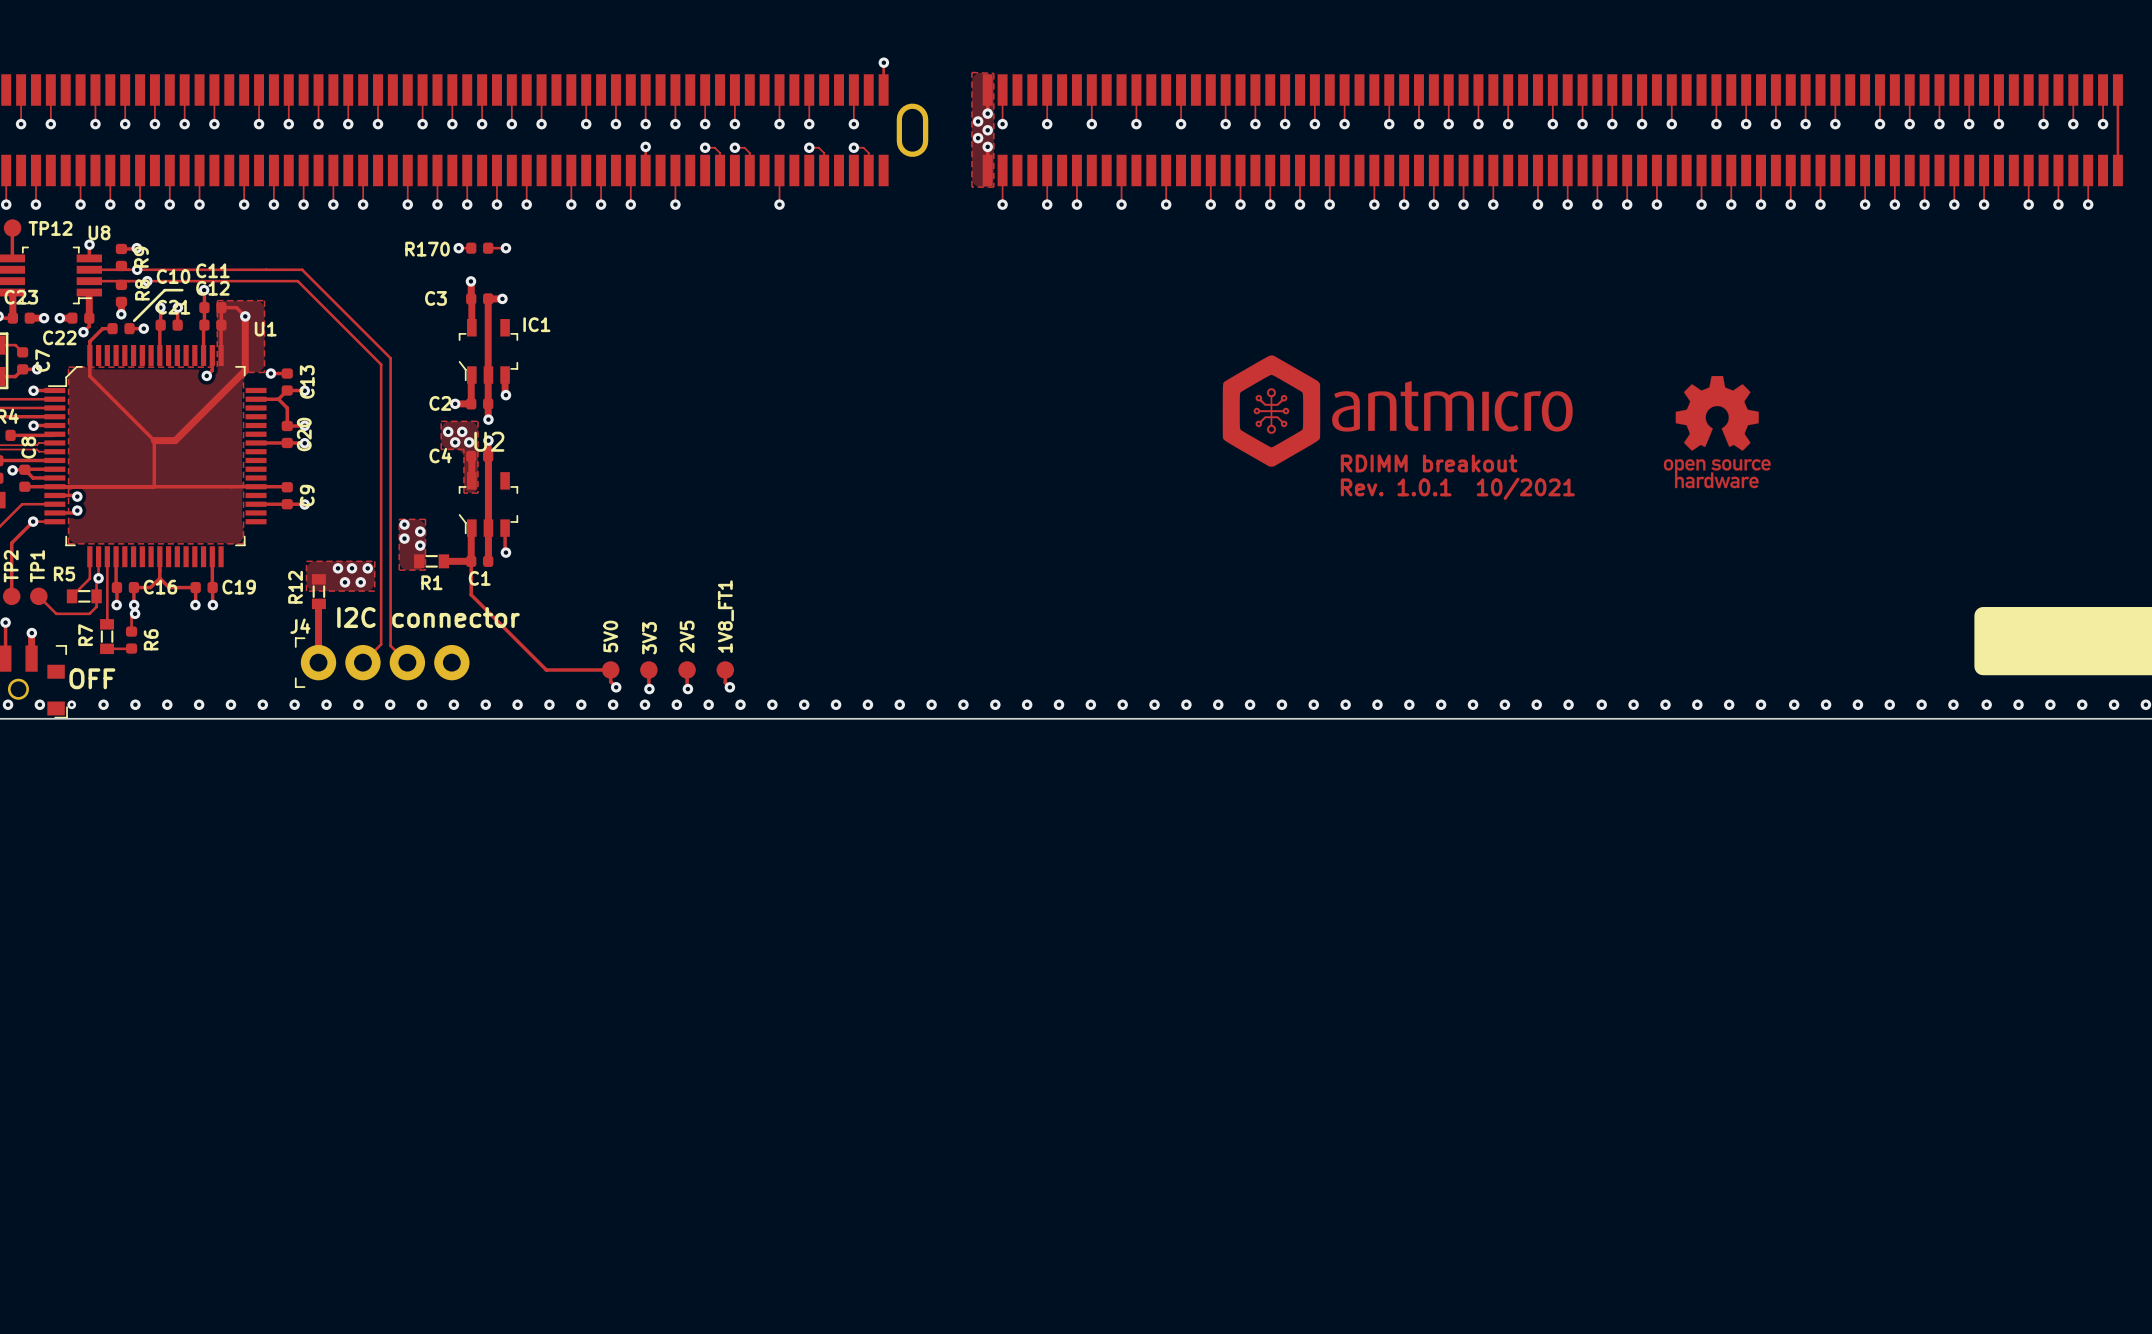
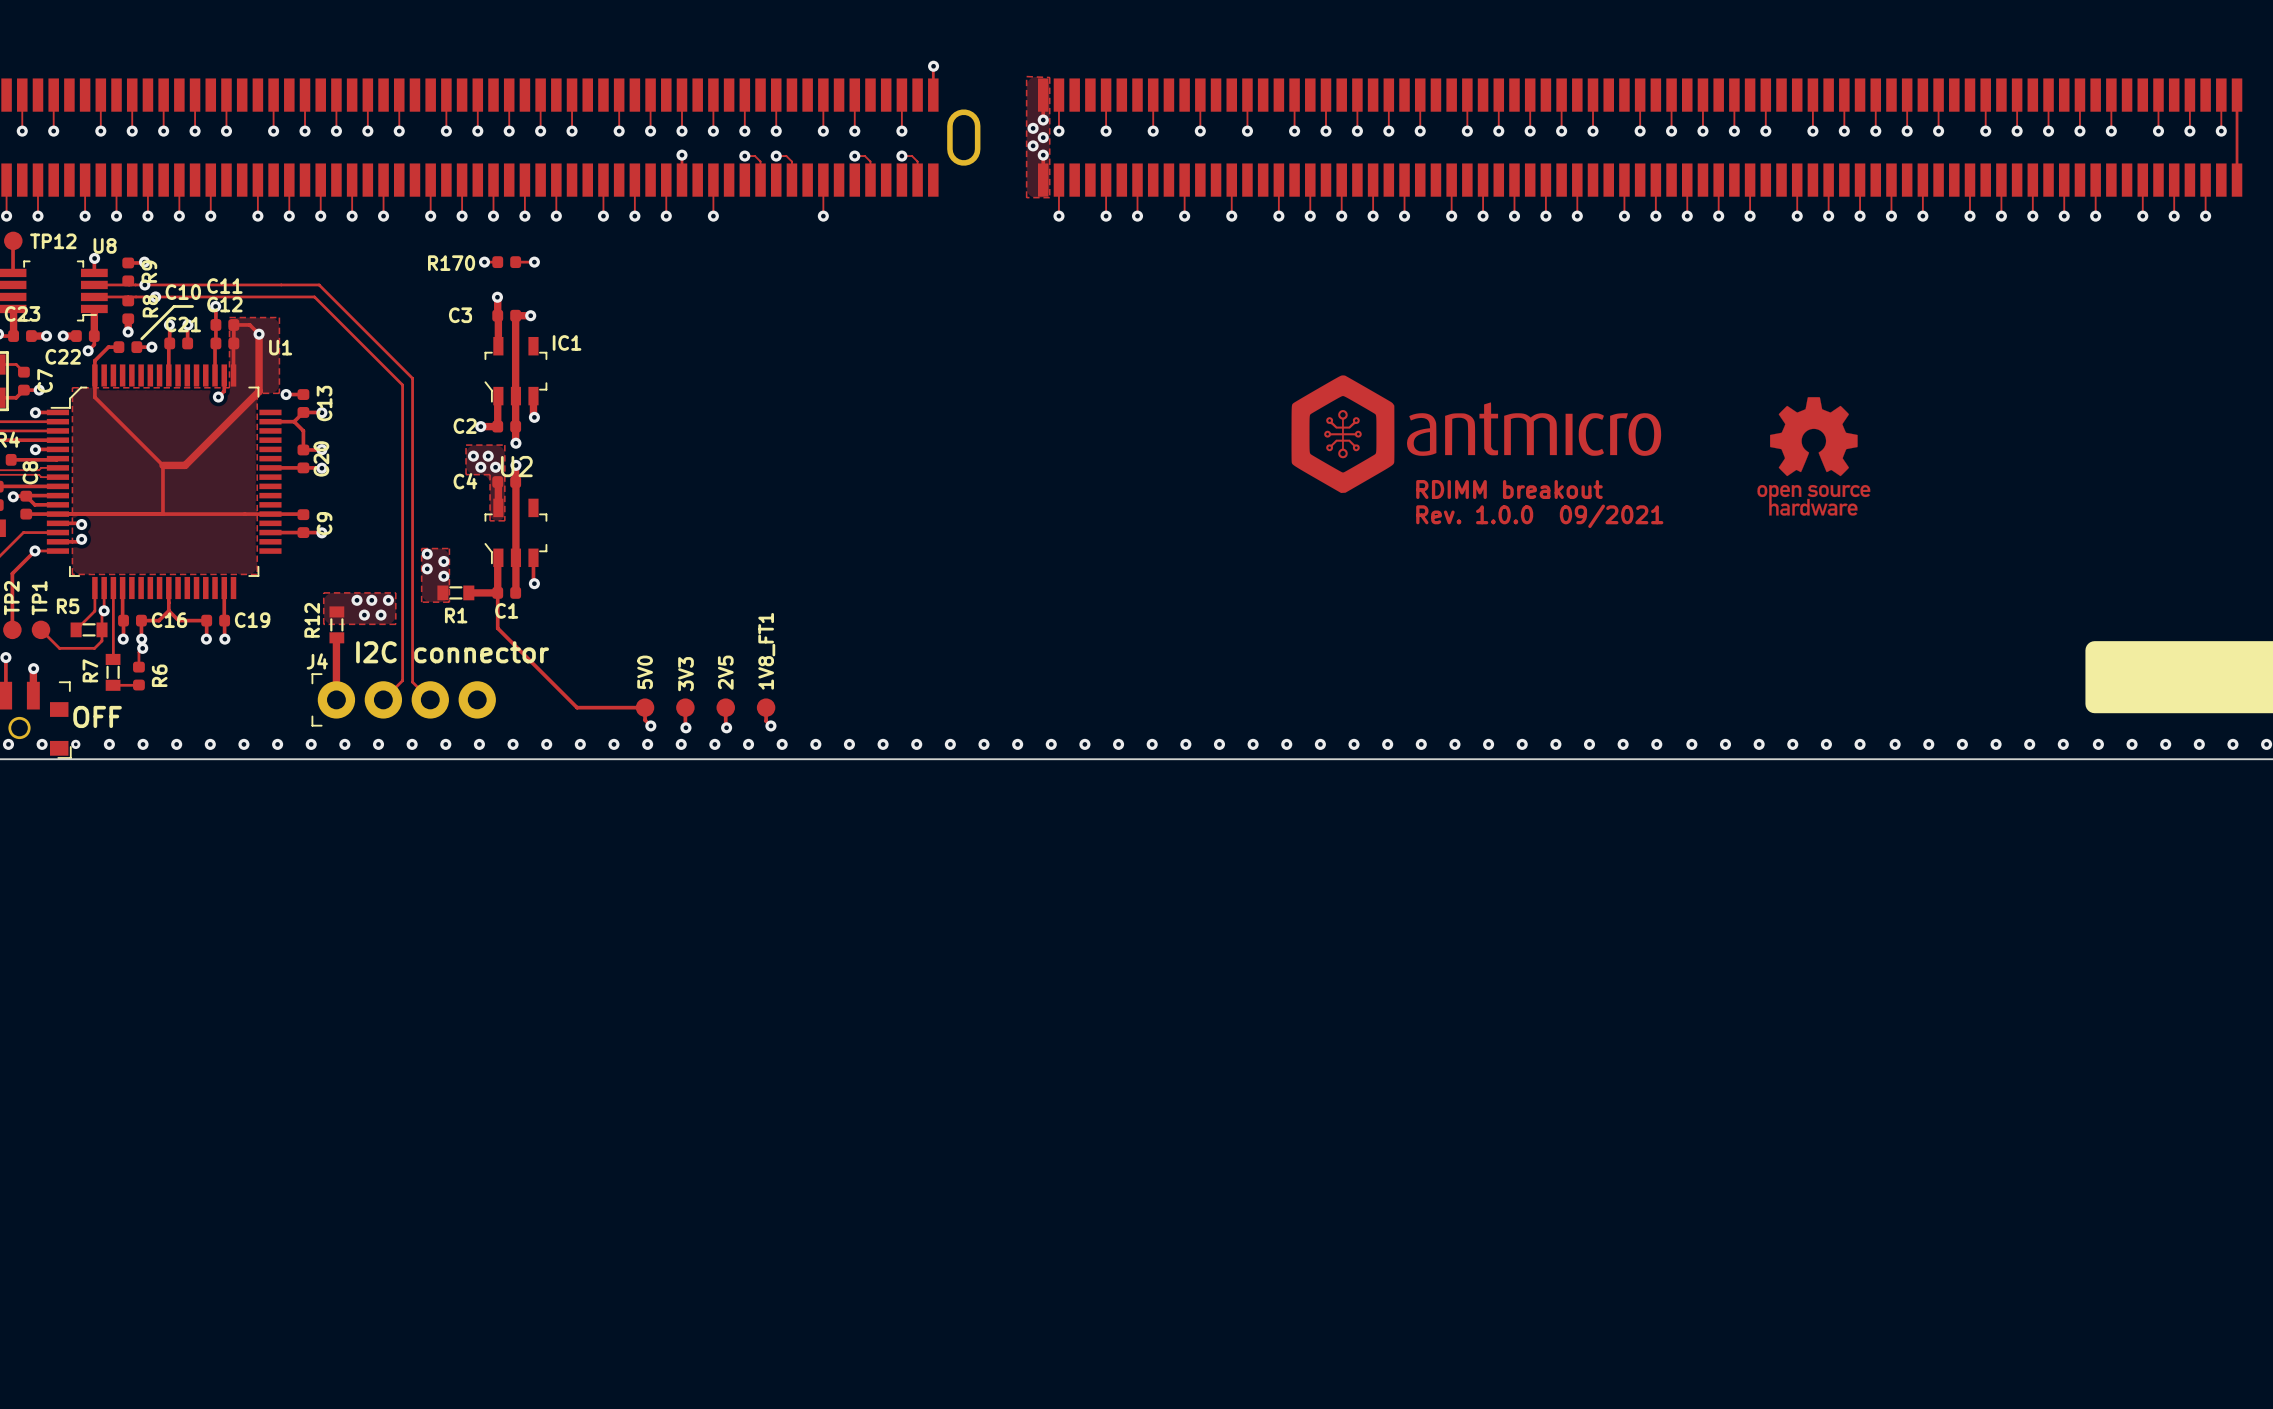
text: Rev. 1.0.1 10/2021 (1457, 488) -> Rev. 1.0.0 09/2021 (1539, 516)

